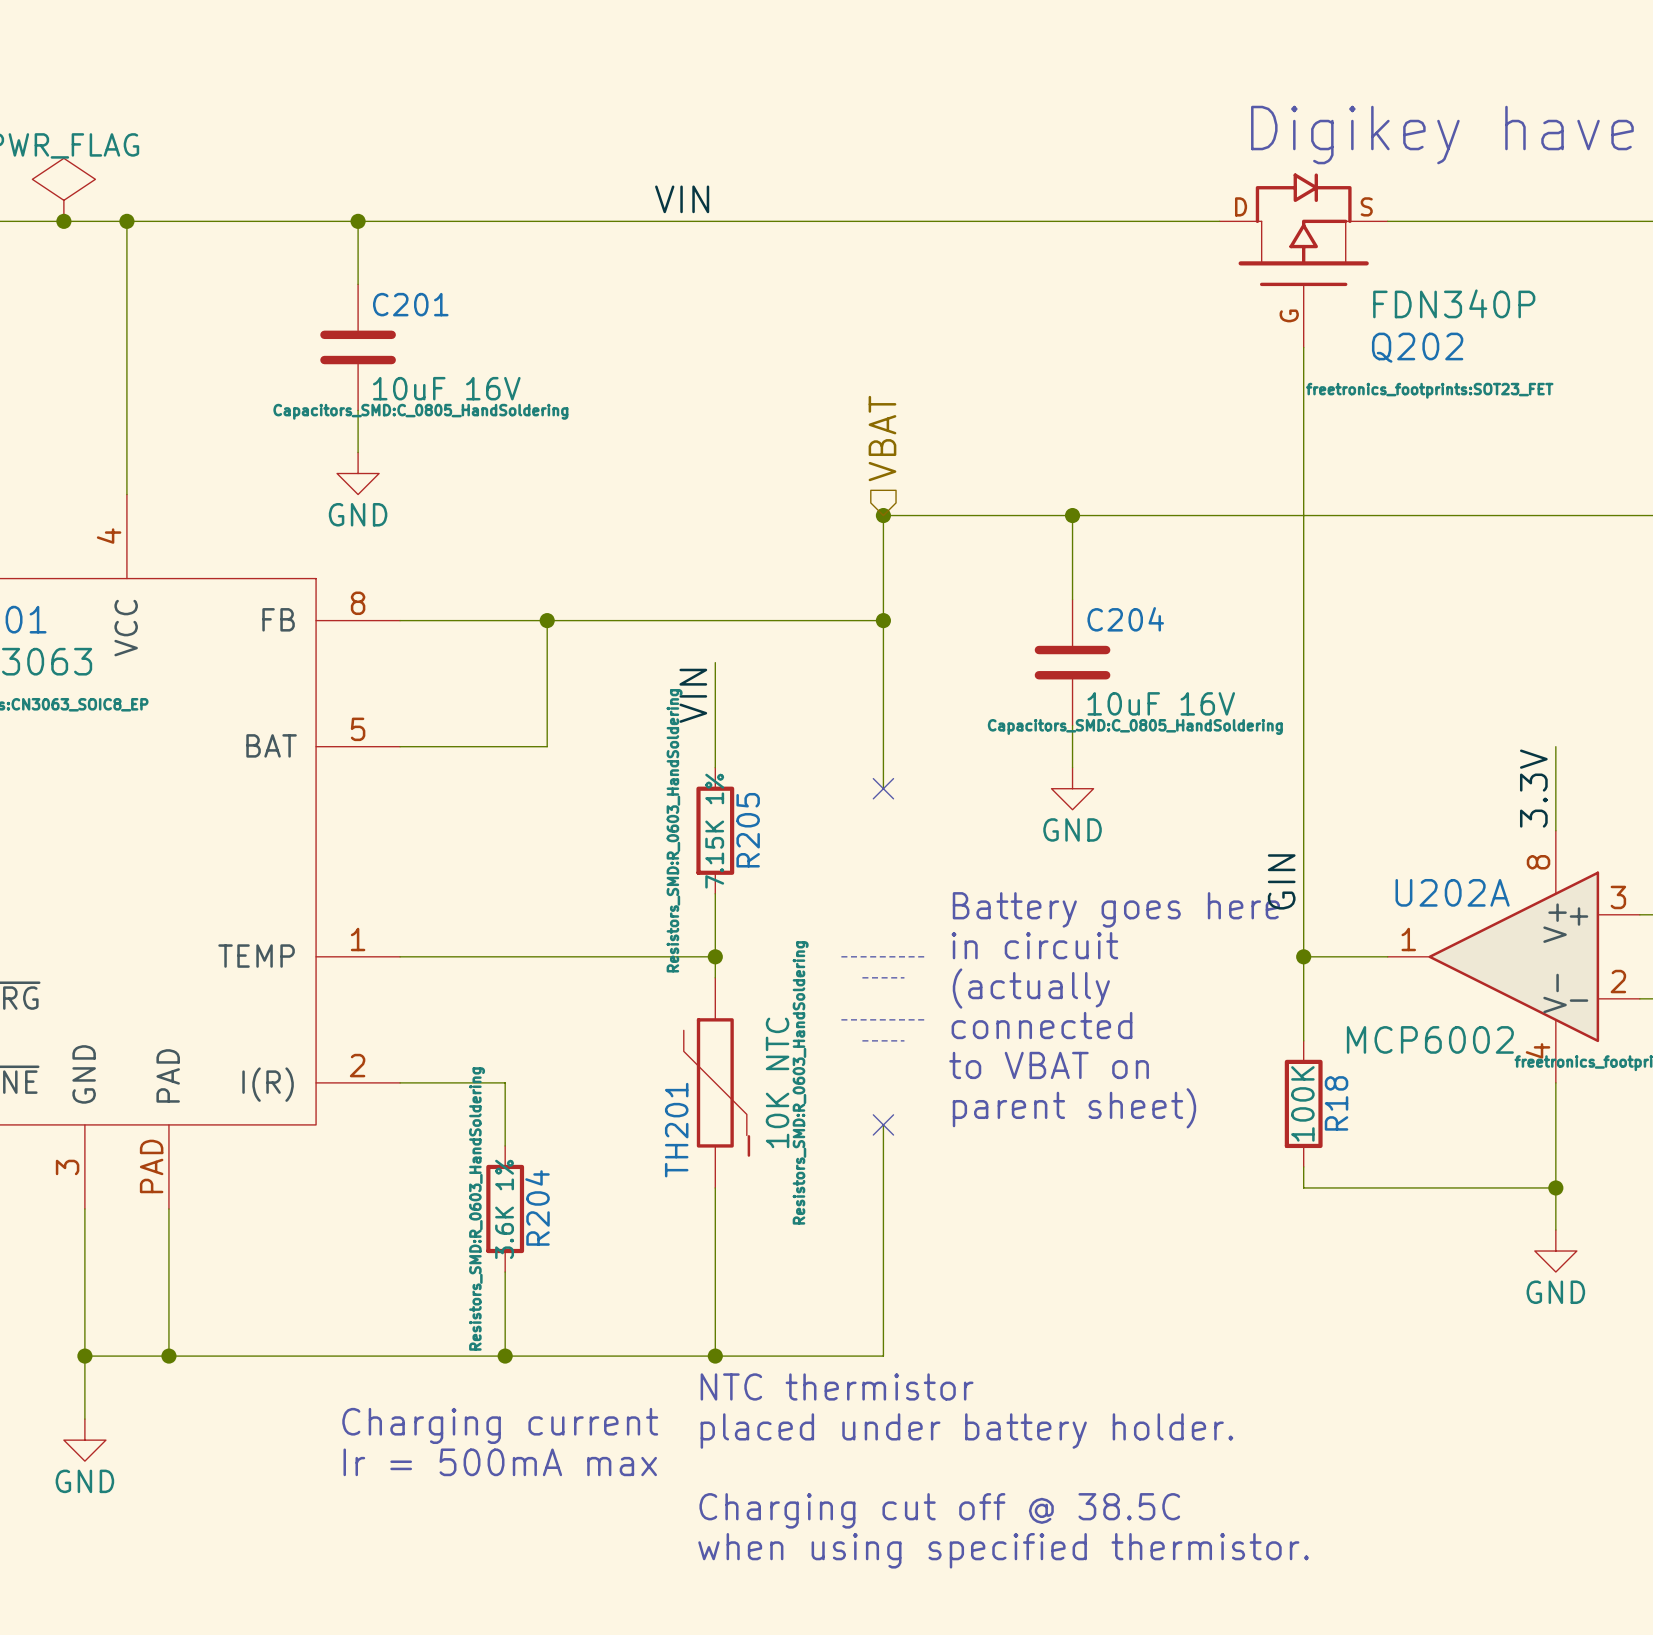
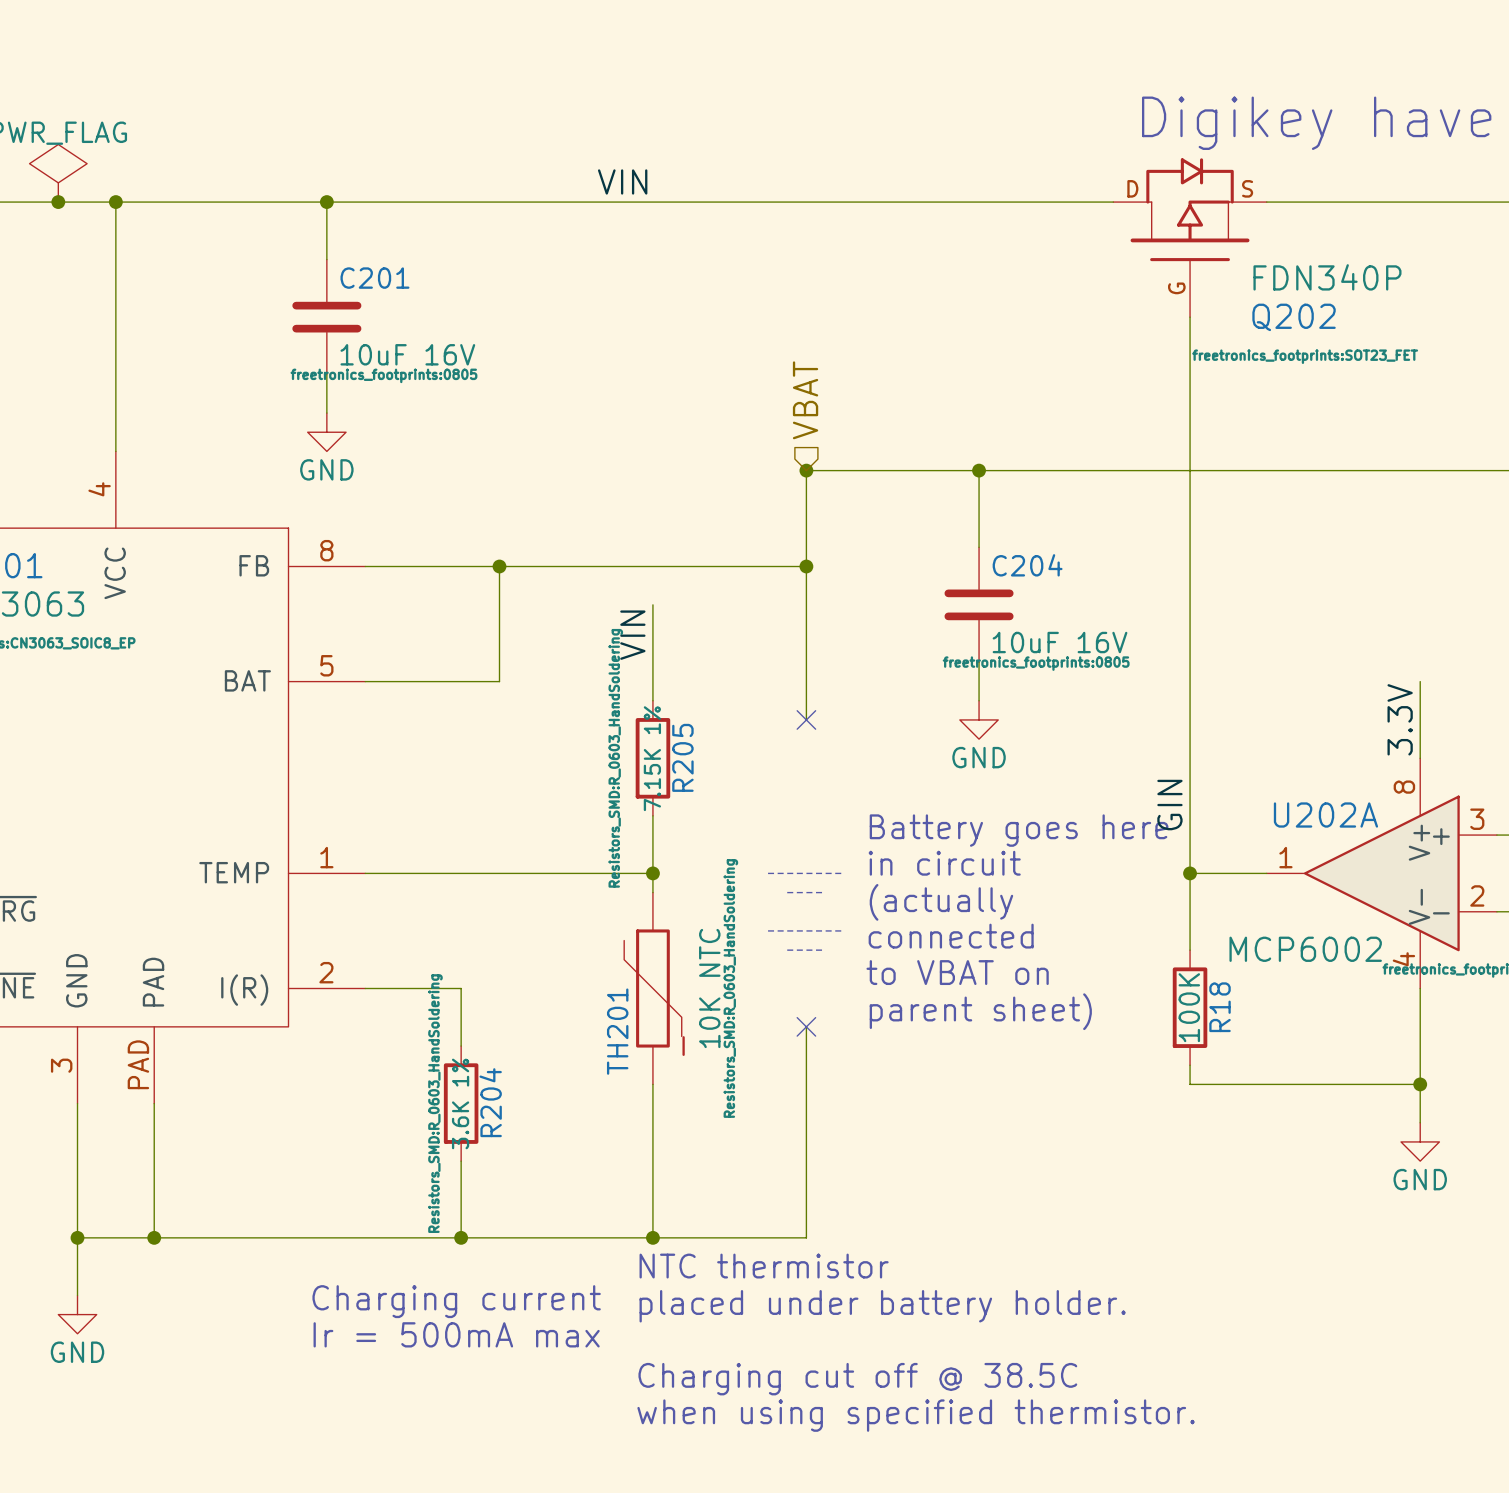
C201 text: Capacitors_SMD:C_0805_HandSoldering (420, 411) -> freetronics_footprints:0805 (383, 375)
C204 text: Capacitors_SMD:C_0805_HandSoldering (1135, 726) -> freetronics_footprints:0805 (1036, 663)

